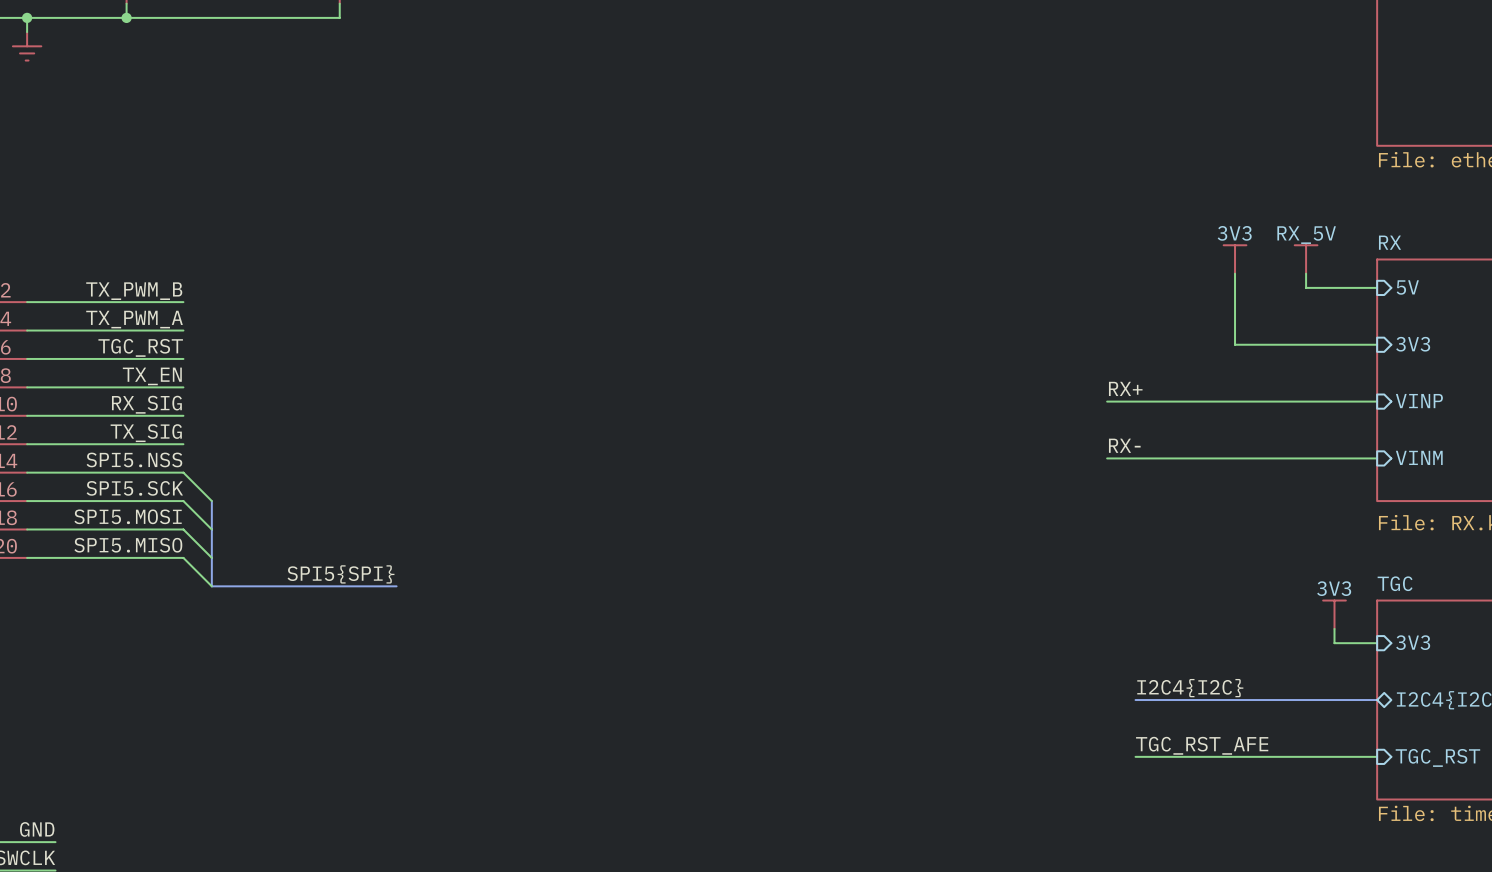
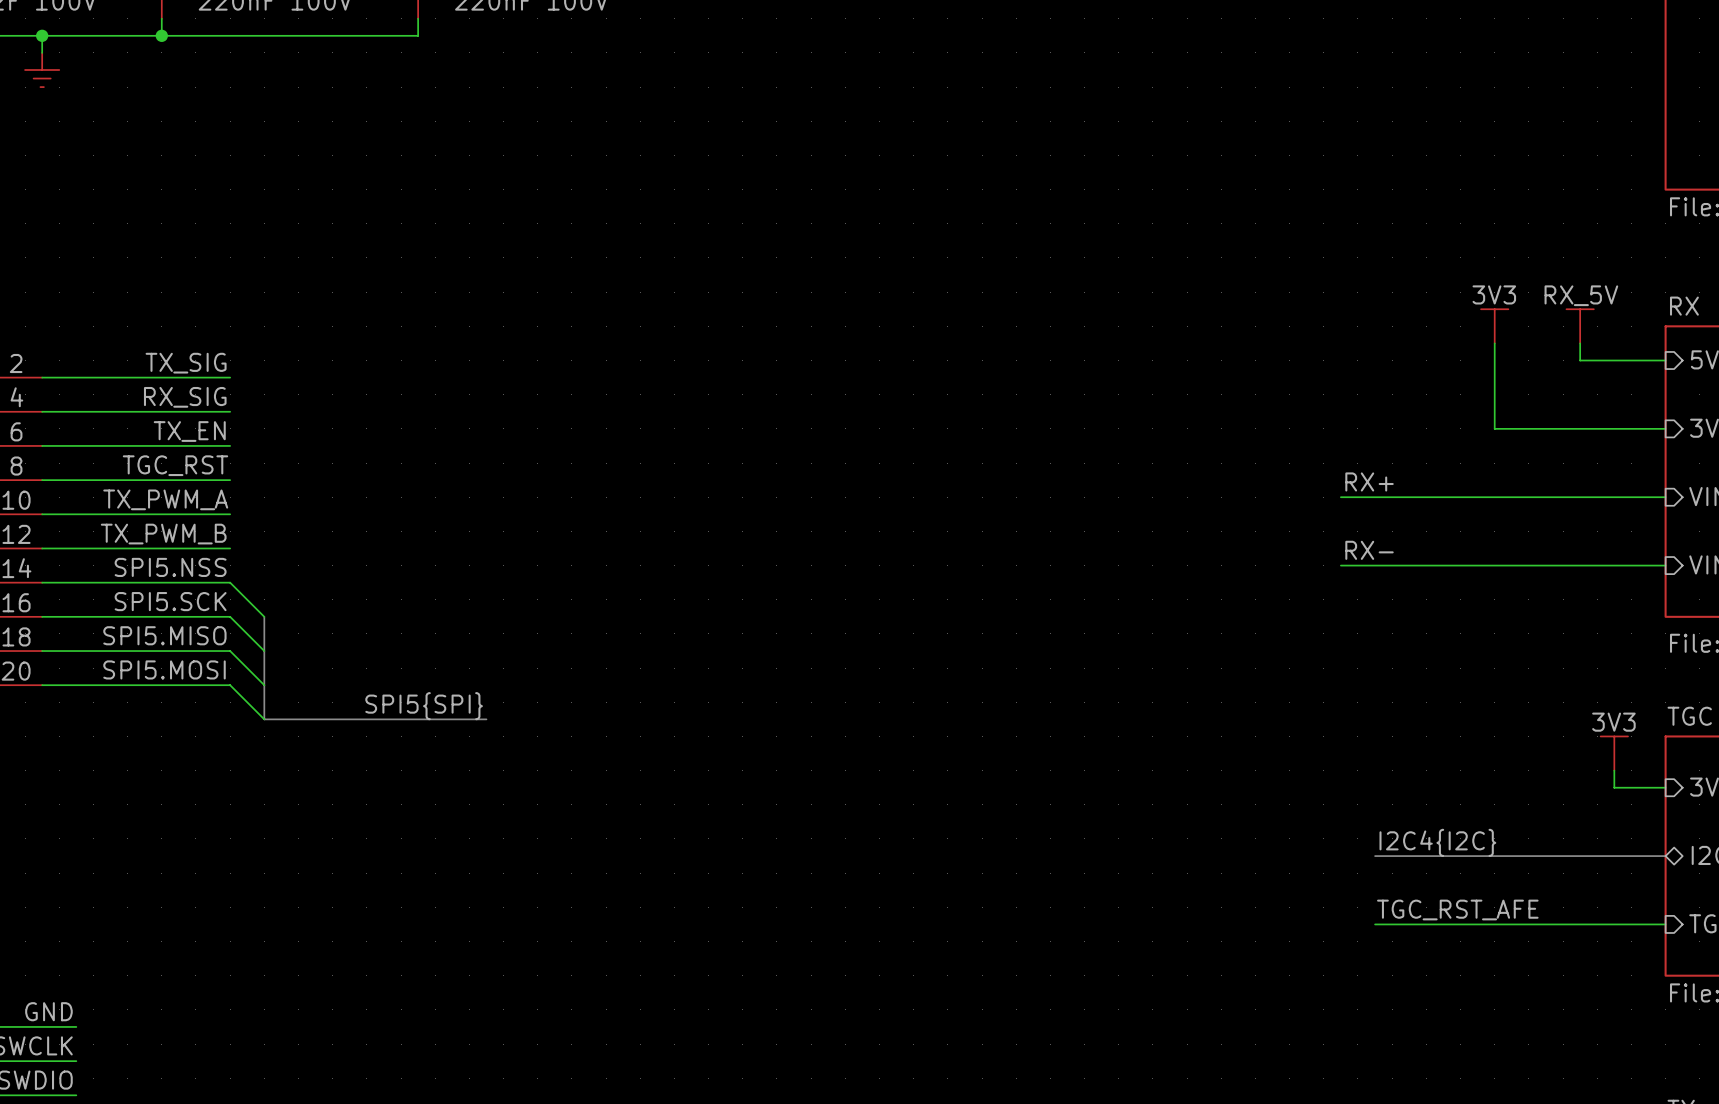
label: TX_PWM_B (134, 291) -> TX_SIG (186, 363)
label: TX_PWM_A (134, 319) -> RX_SIG (185, 397)
label: TGC_RST (140, 347) -> TX_EN (189, 431)
label: TX_EN (152, 376) -> TGC_RST (175, 465)
label: RX_SIG (146, 404) -> TX_PWM_A (165, 499)
label: TX_SIG (146, 433) -> TX_PWM_B (163, 534)
label: SPI5.MOSI (128, 516) -> SPI5.MISO (164, 635)
label: SPI5.MISO (128, 545) -> SPI5.MOSI (164, 669)

